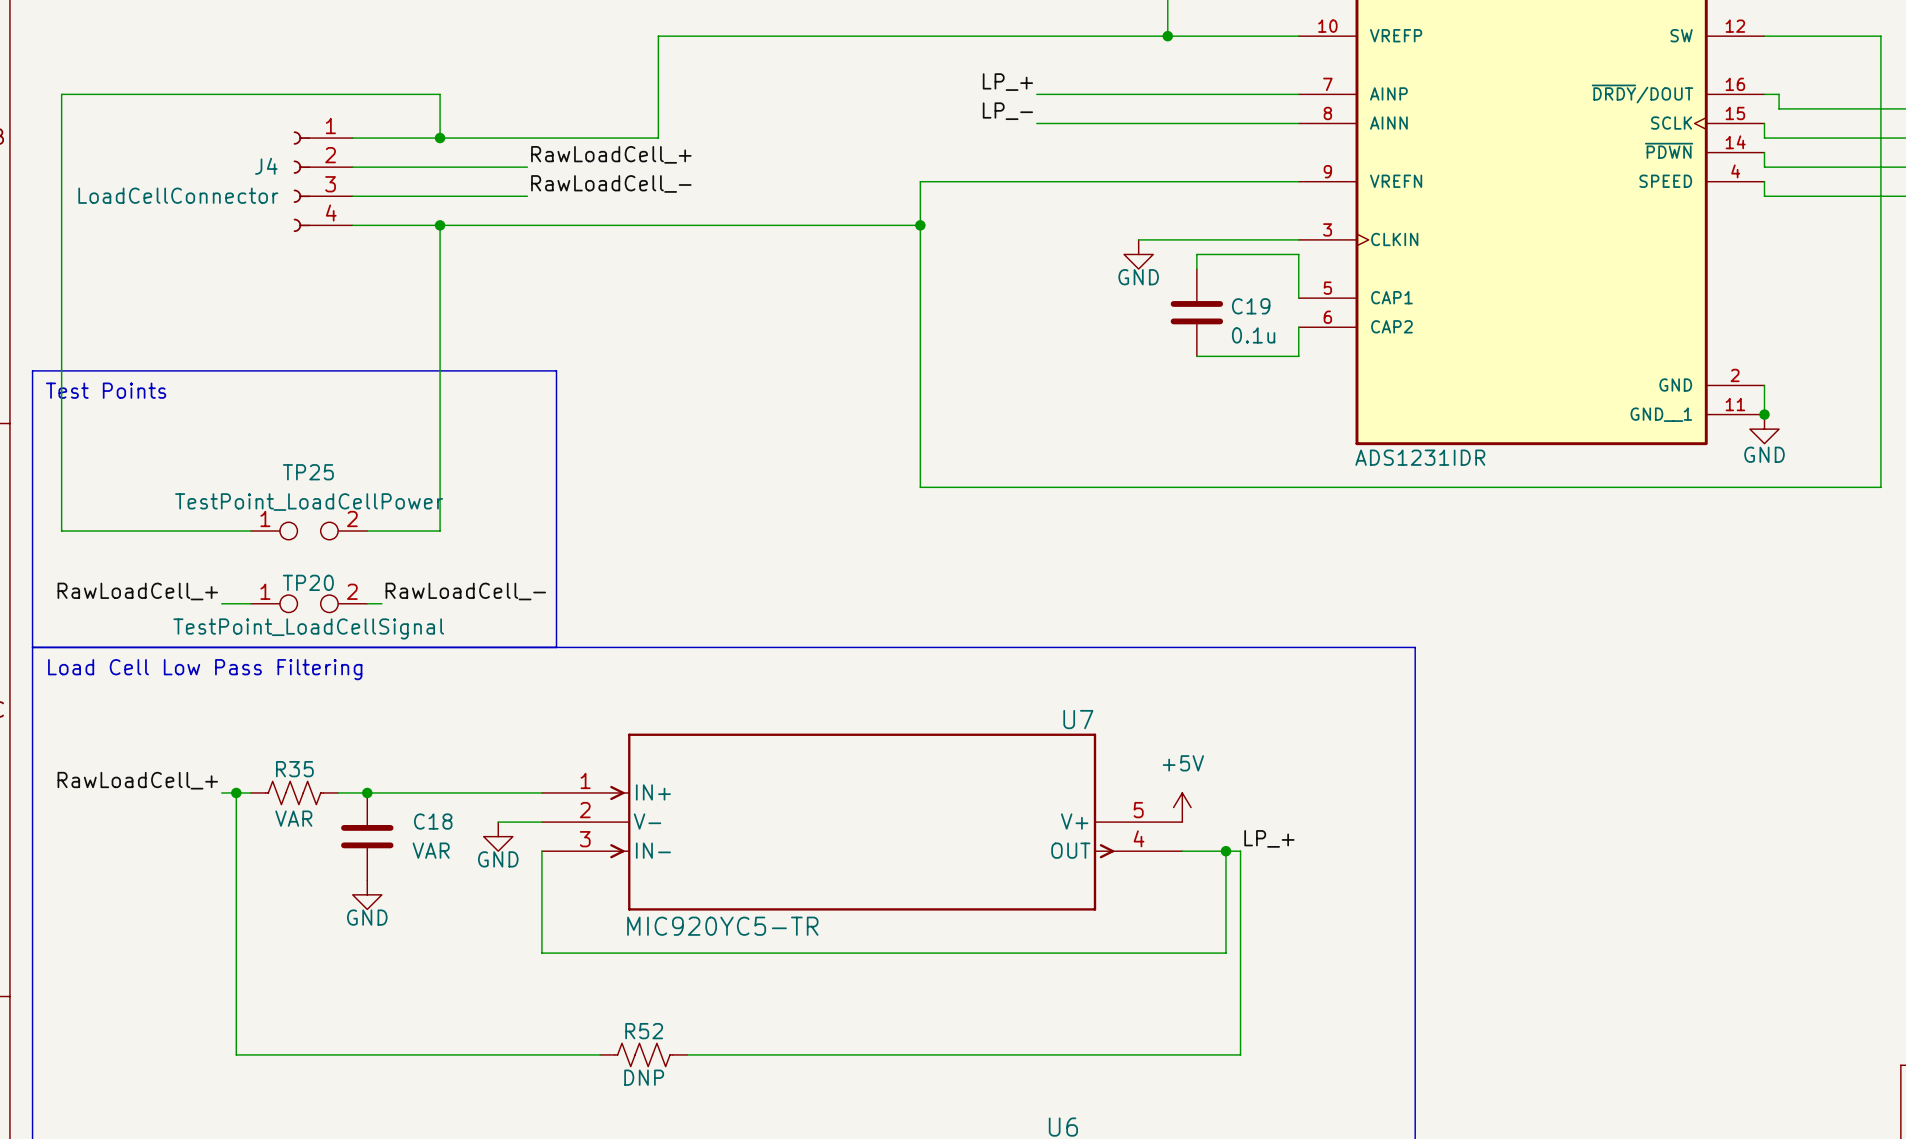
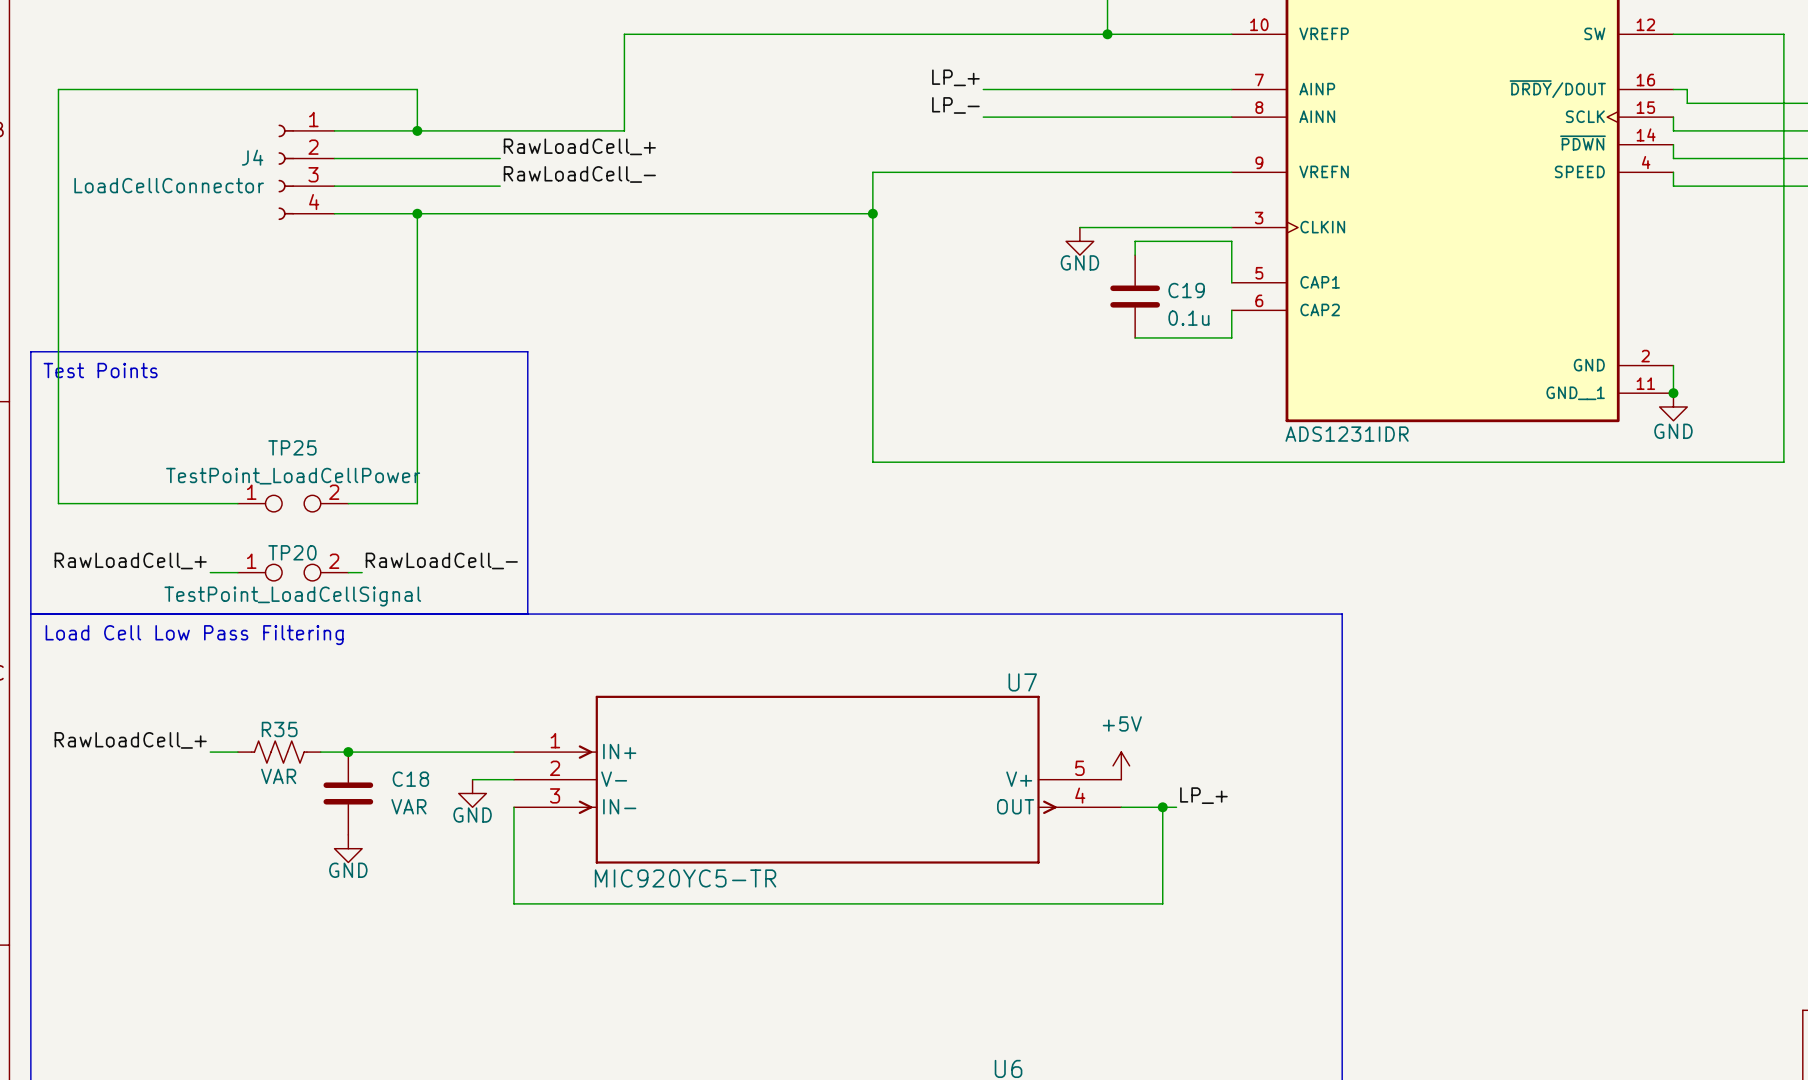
wire: (236, 792) (236, 1054) (600, 1054) -> none
junction: (236, 792) -> none
wire: (1240, 851) (1240, 1054) (687, 1054) -> none
R52: DNP (643, 1054) -> none

